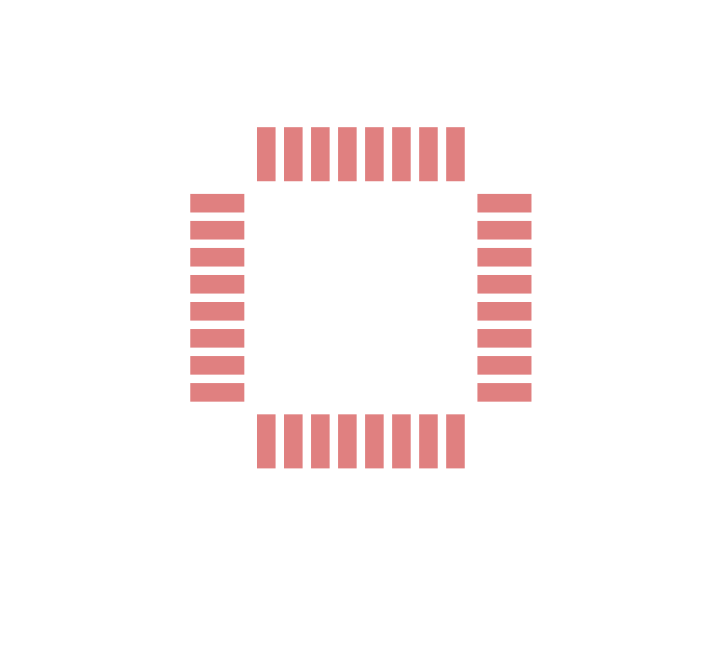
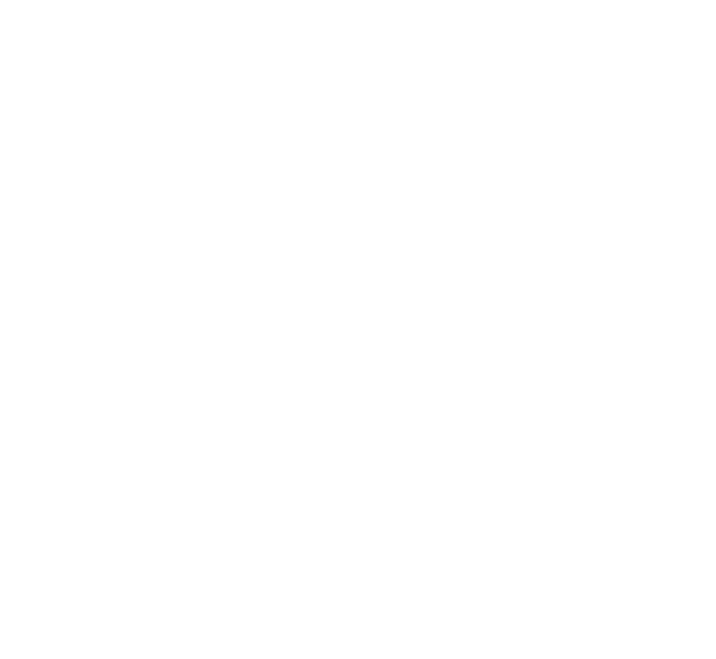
part: (360, 297) -> none

